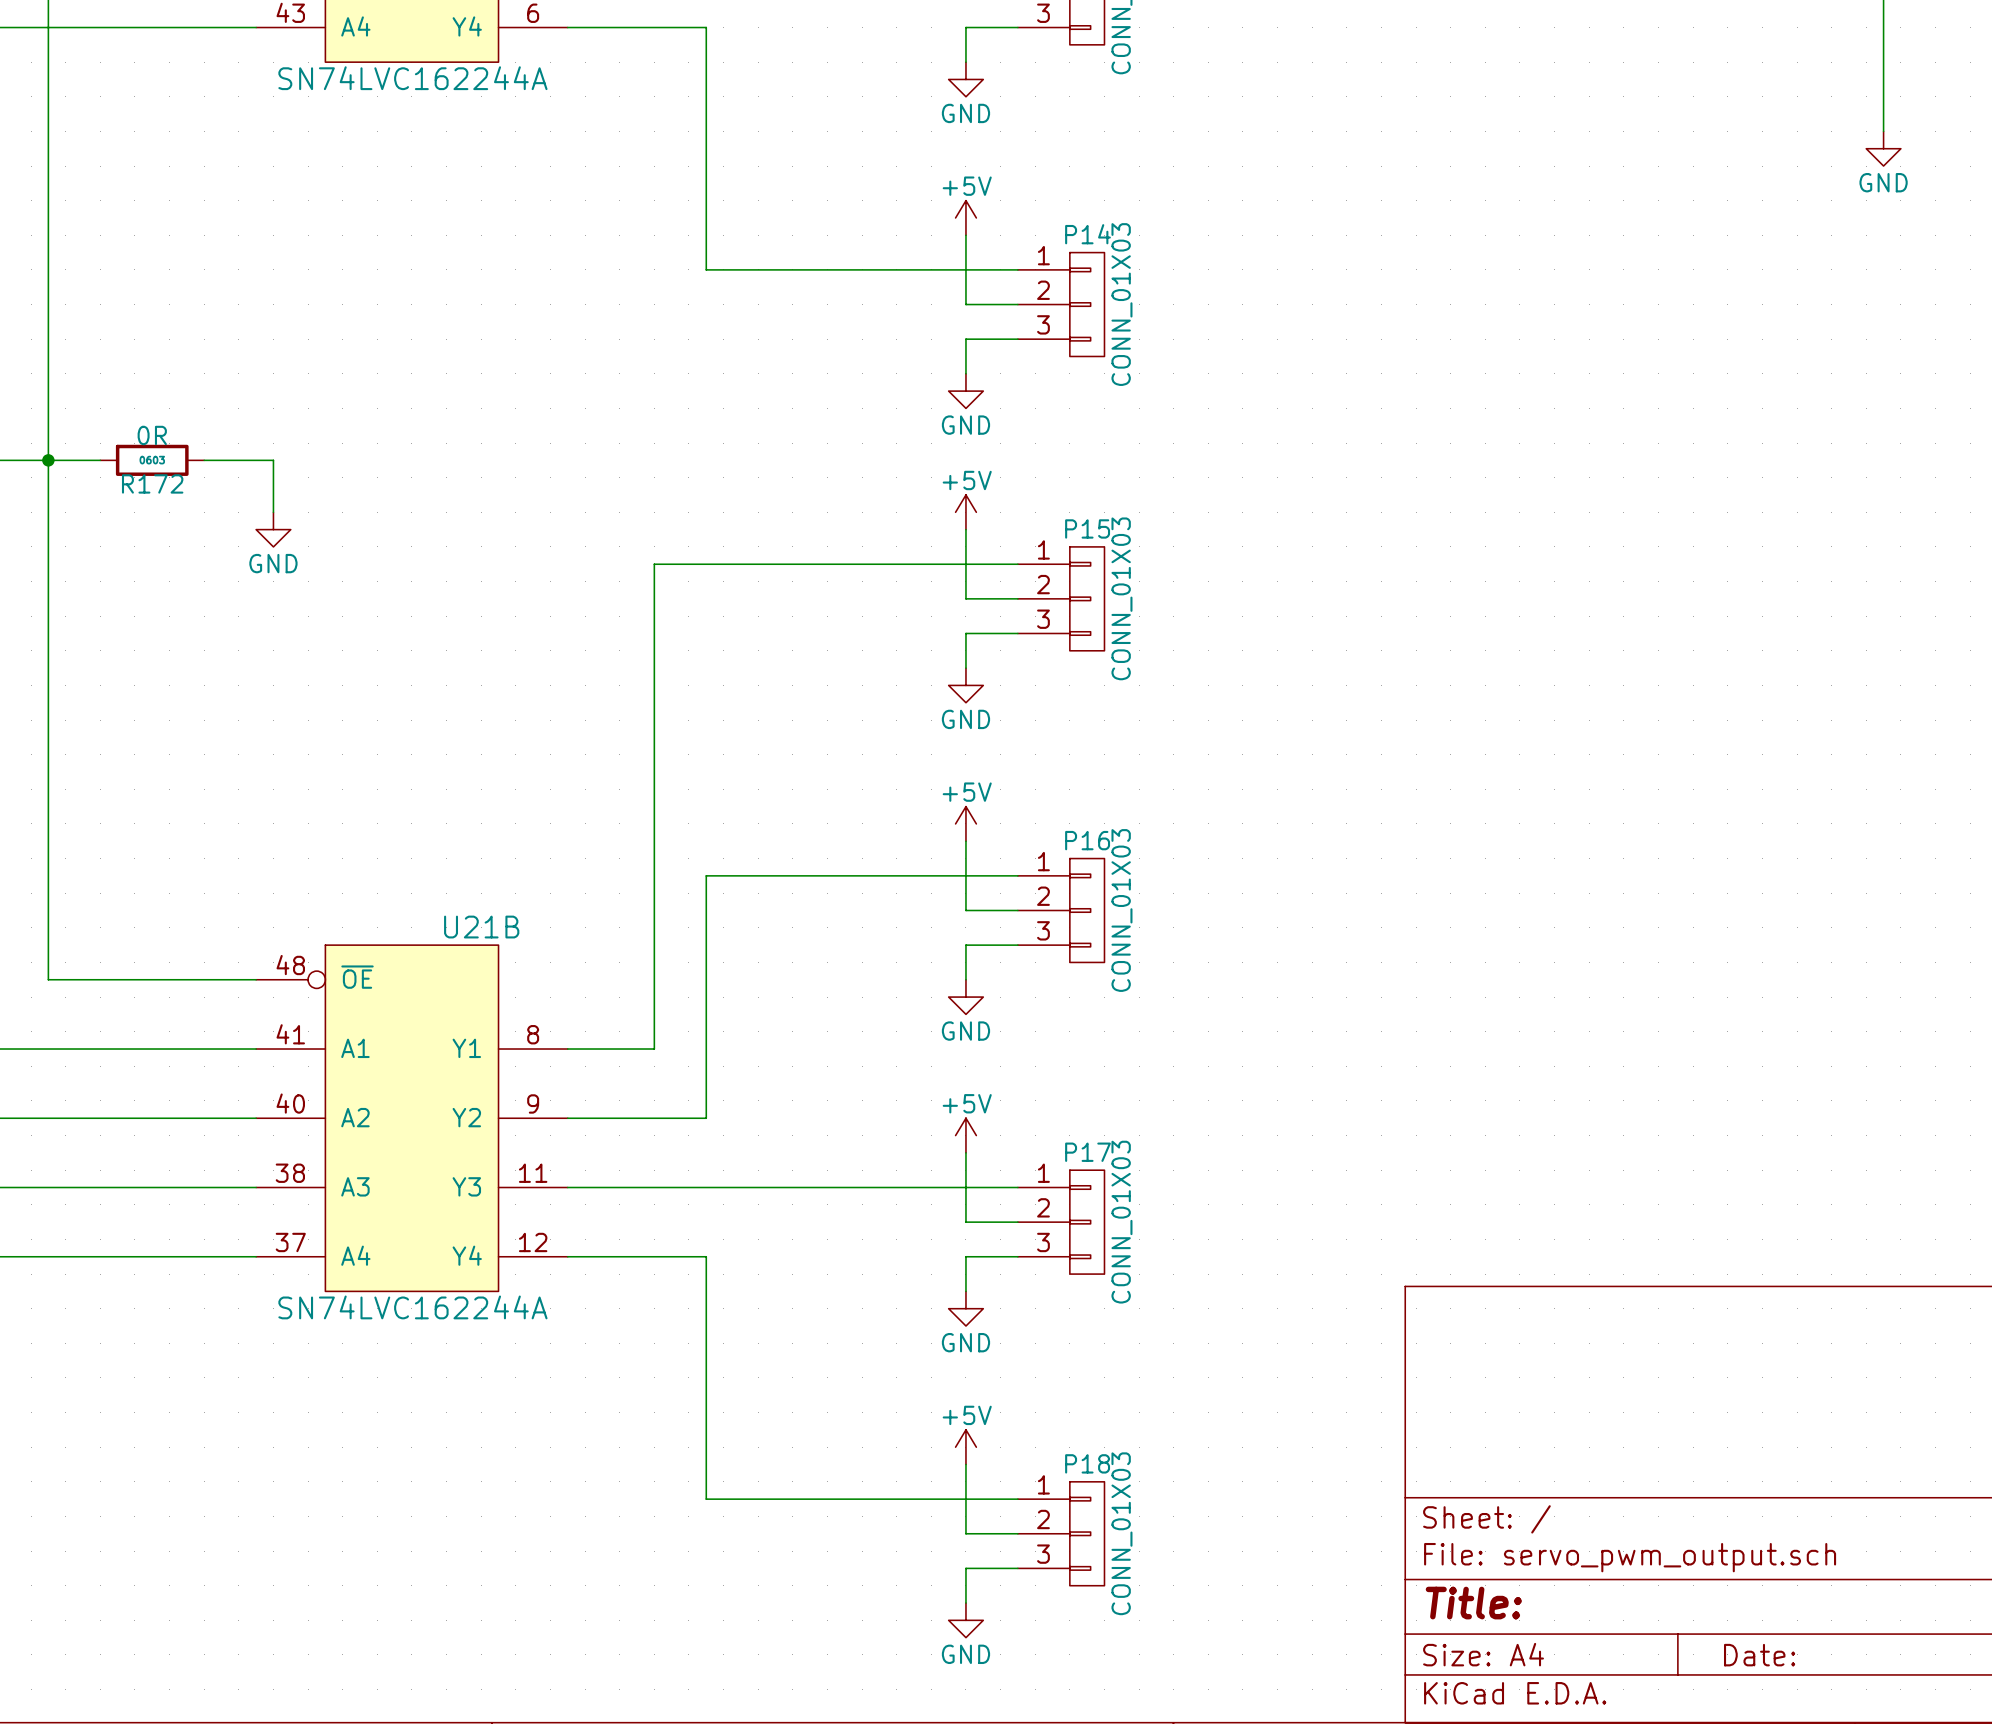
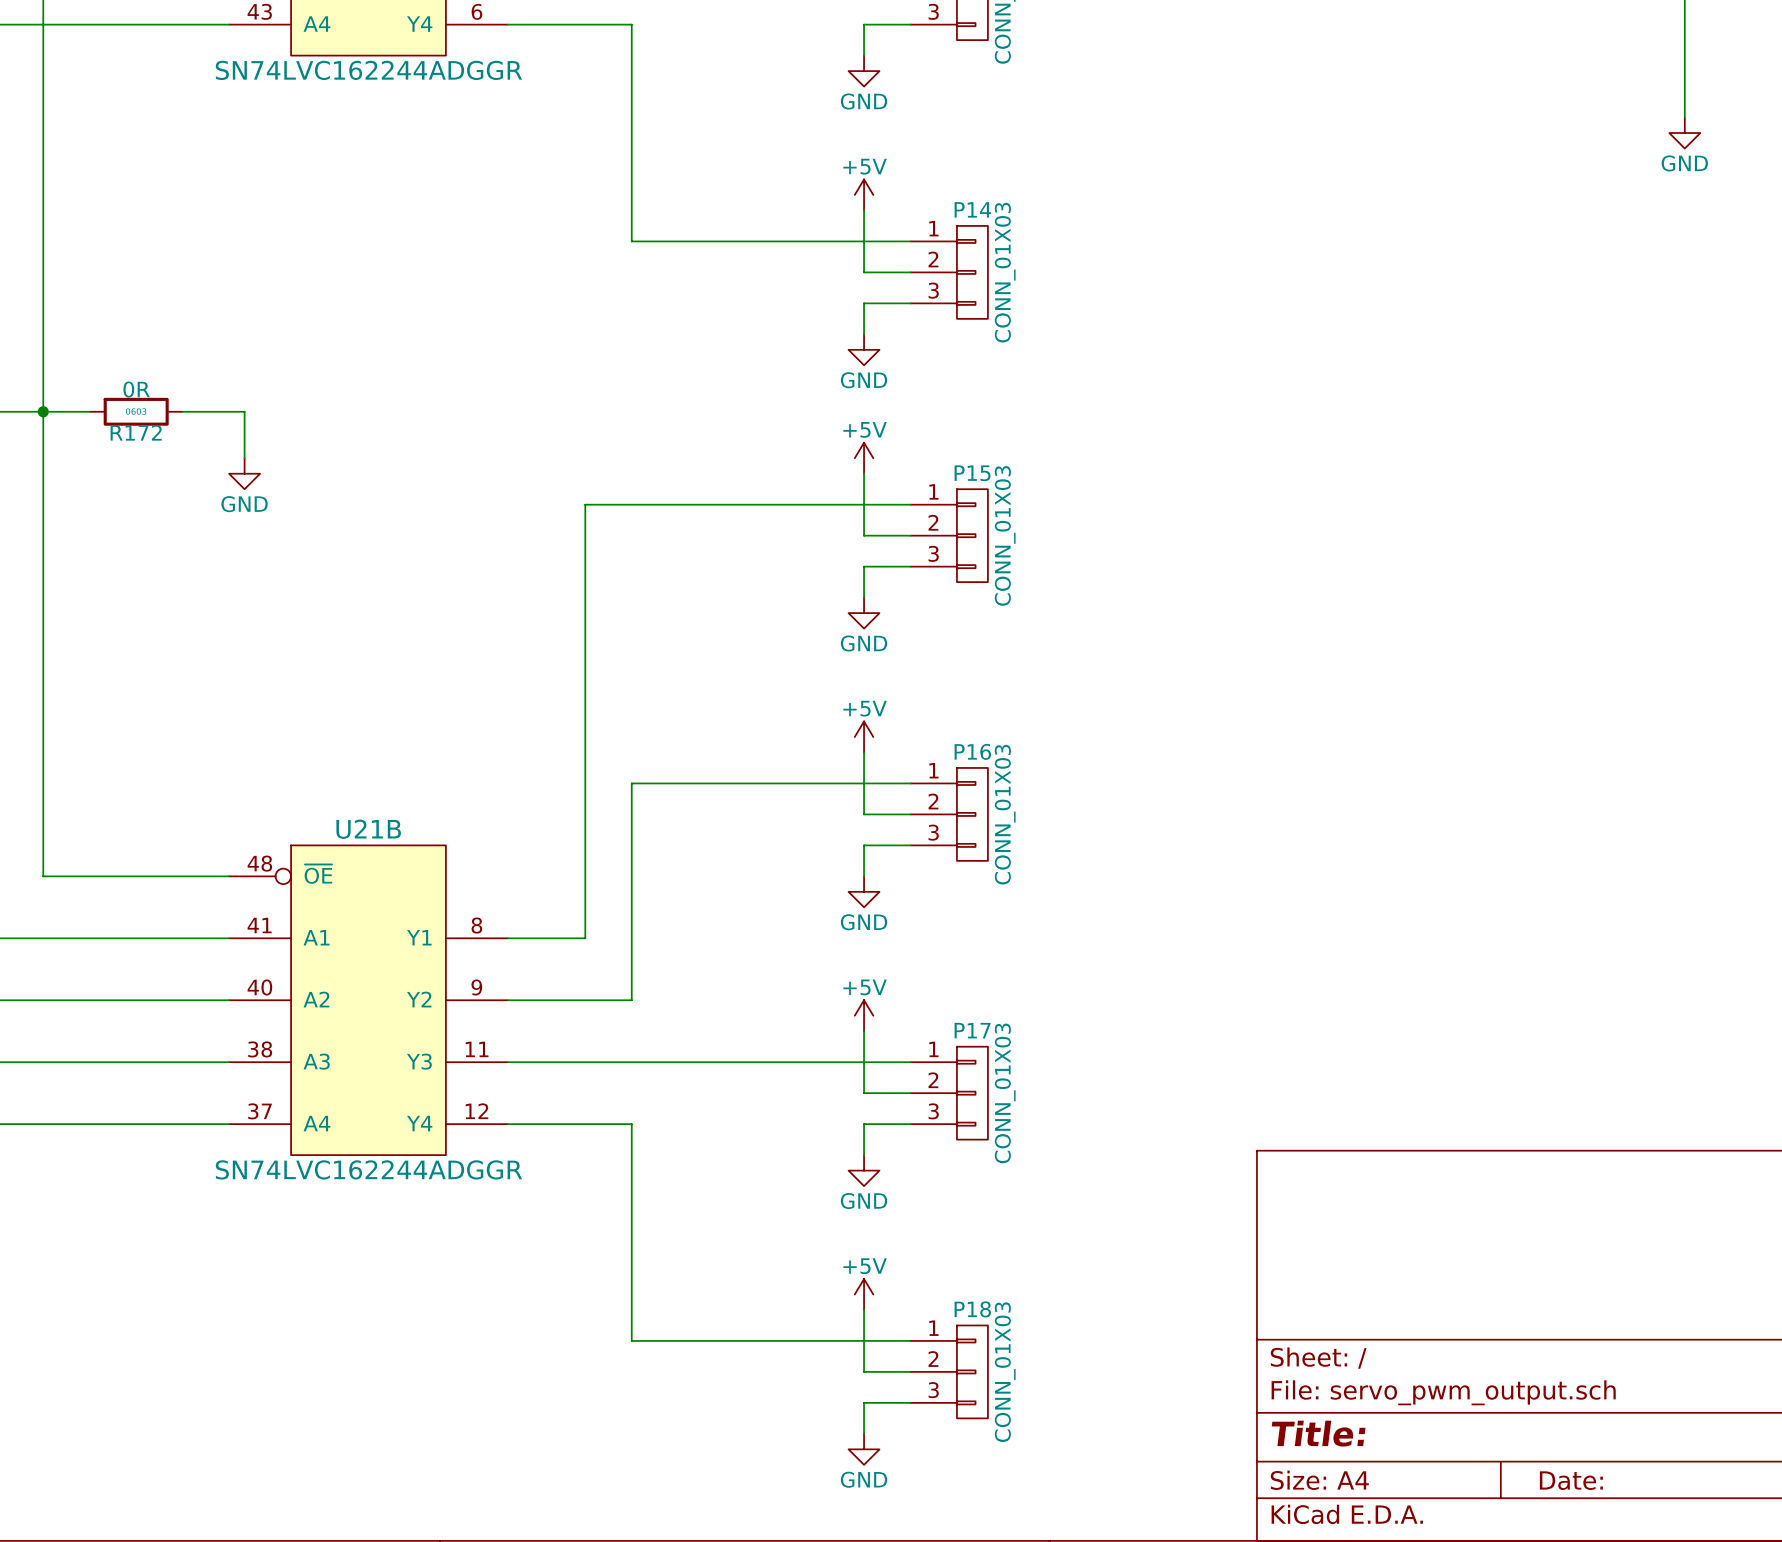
part value: SN74LVC162244A (412, 78) -> SN74LVC162244ADGGR (368, 70)
U21B name position: U21B (481, 927) -> U21B (368, 829)
U21B value: SN74LVC162244A (412, 1307) -> SN74LVC162244ADGGR (368, 1169)

